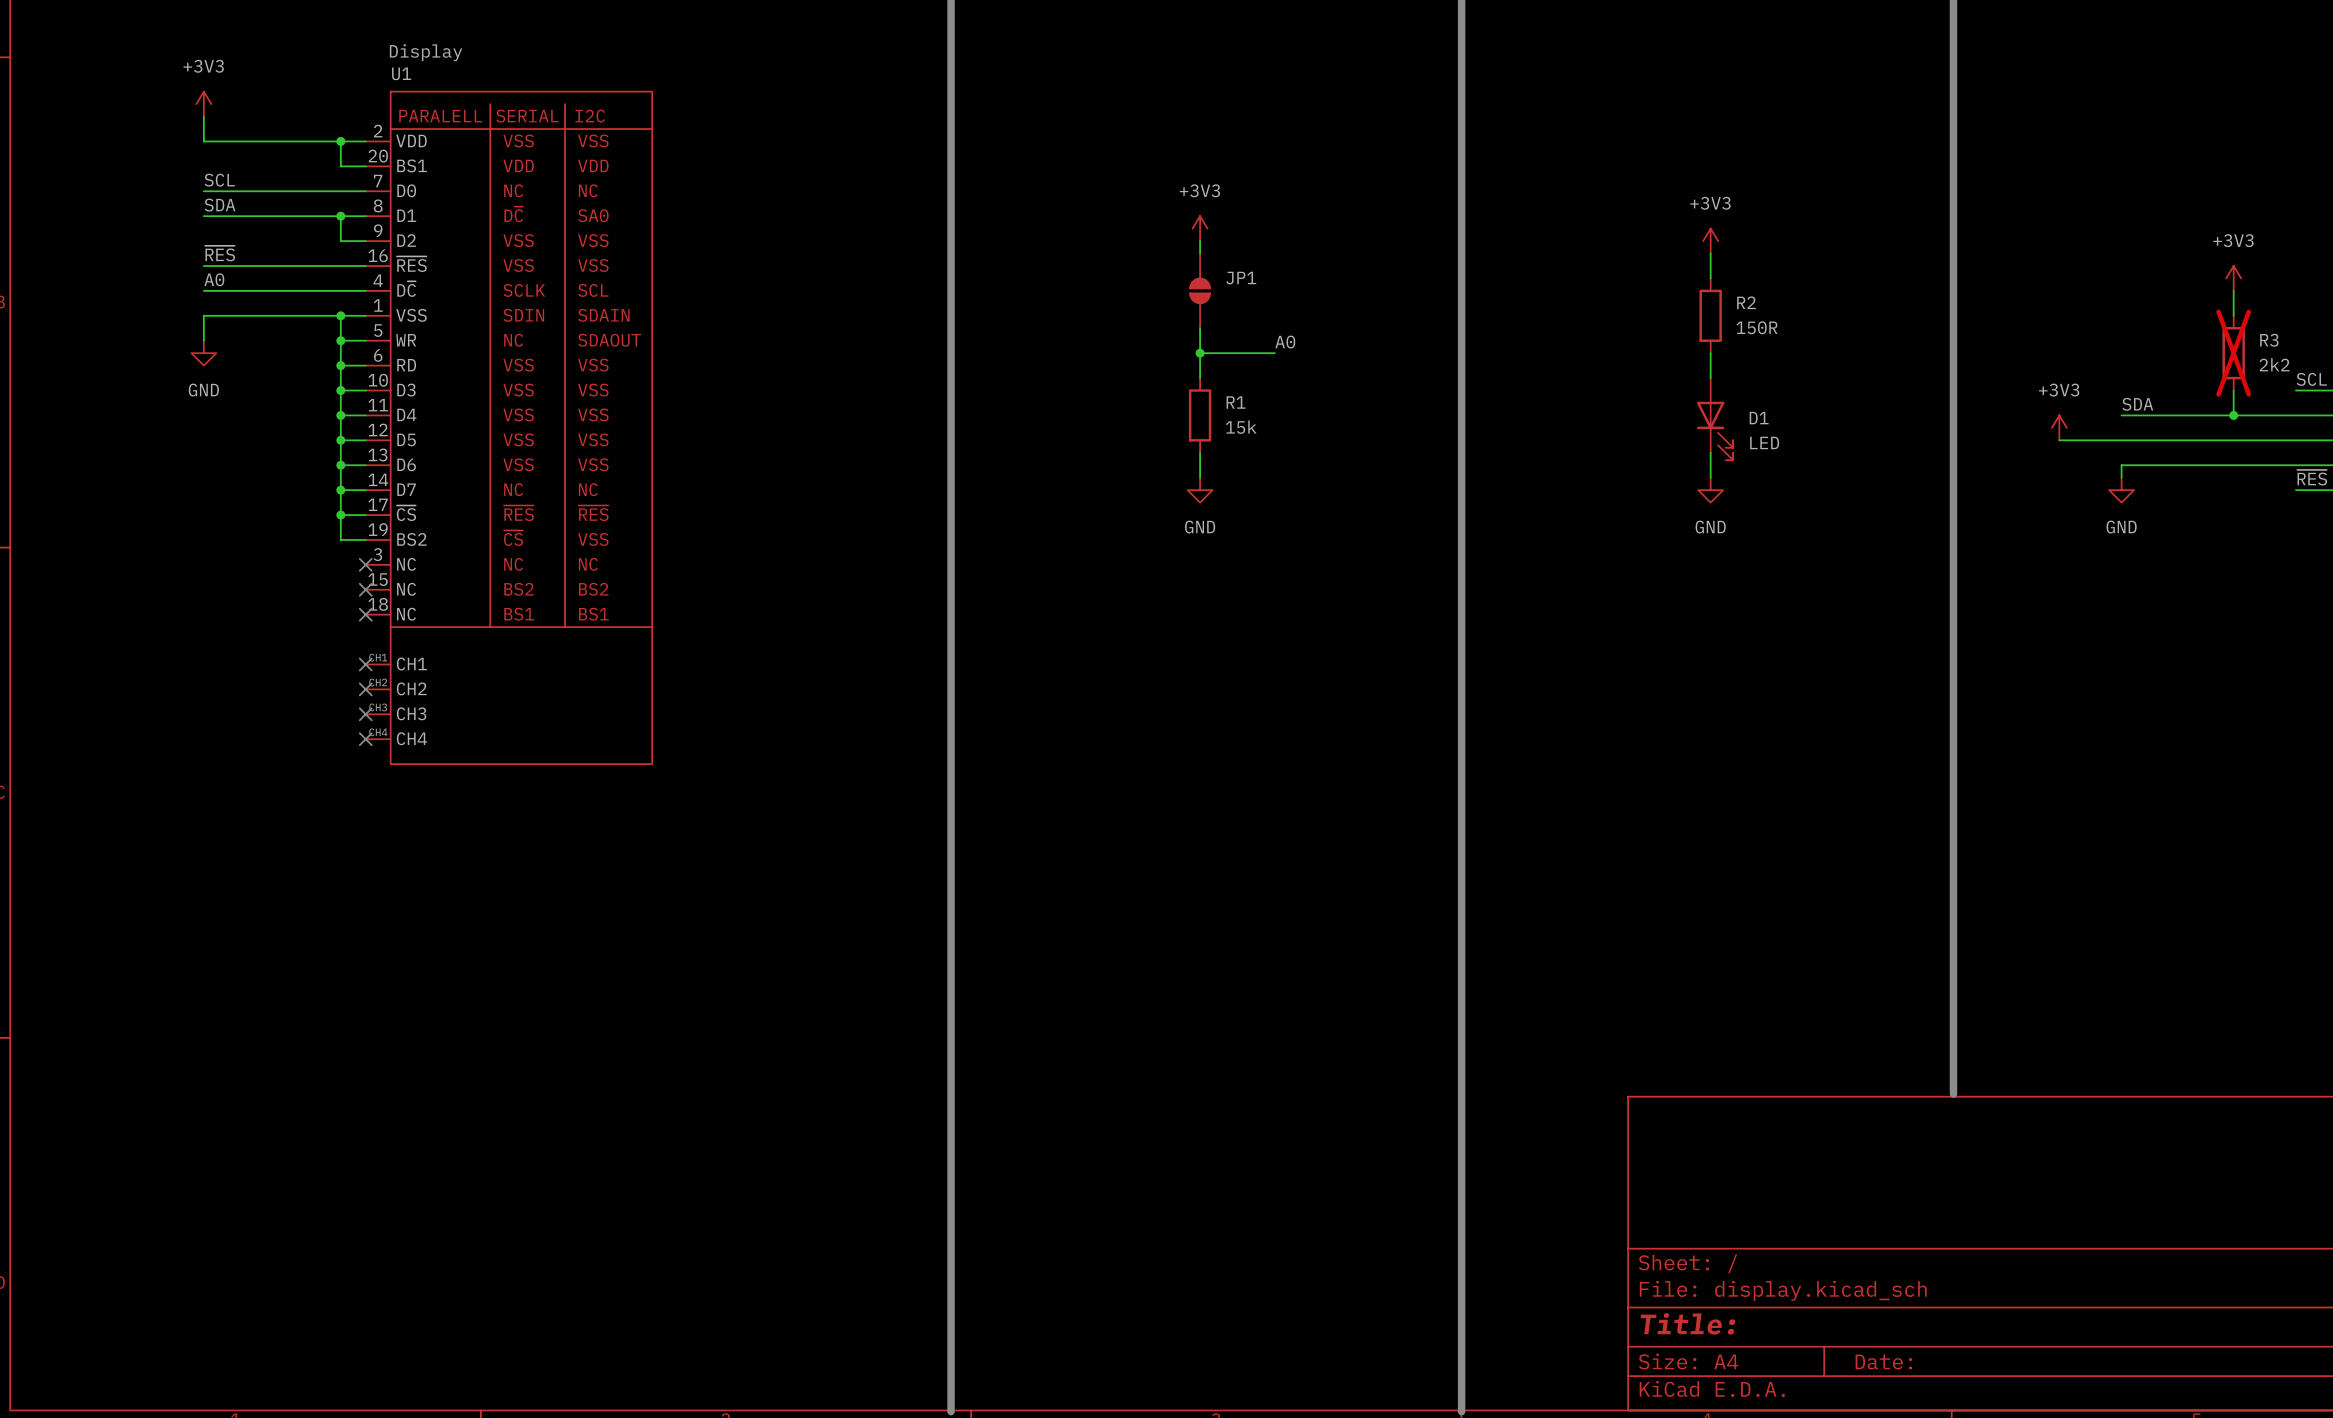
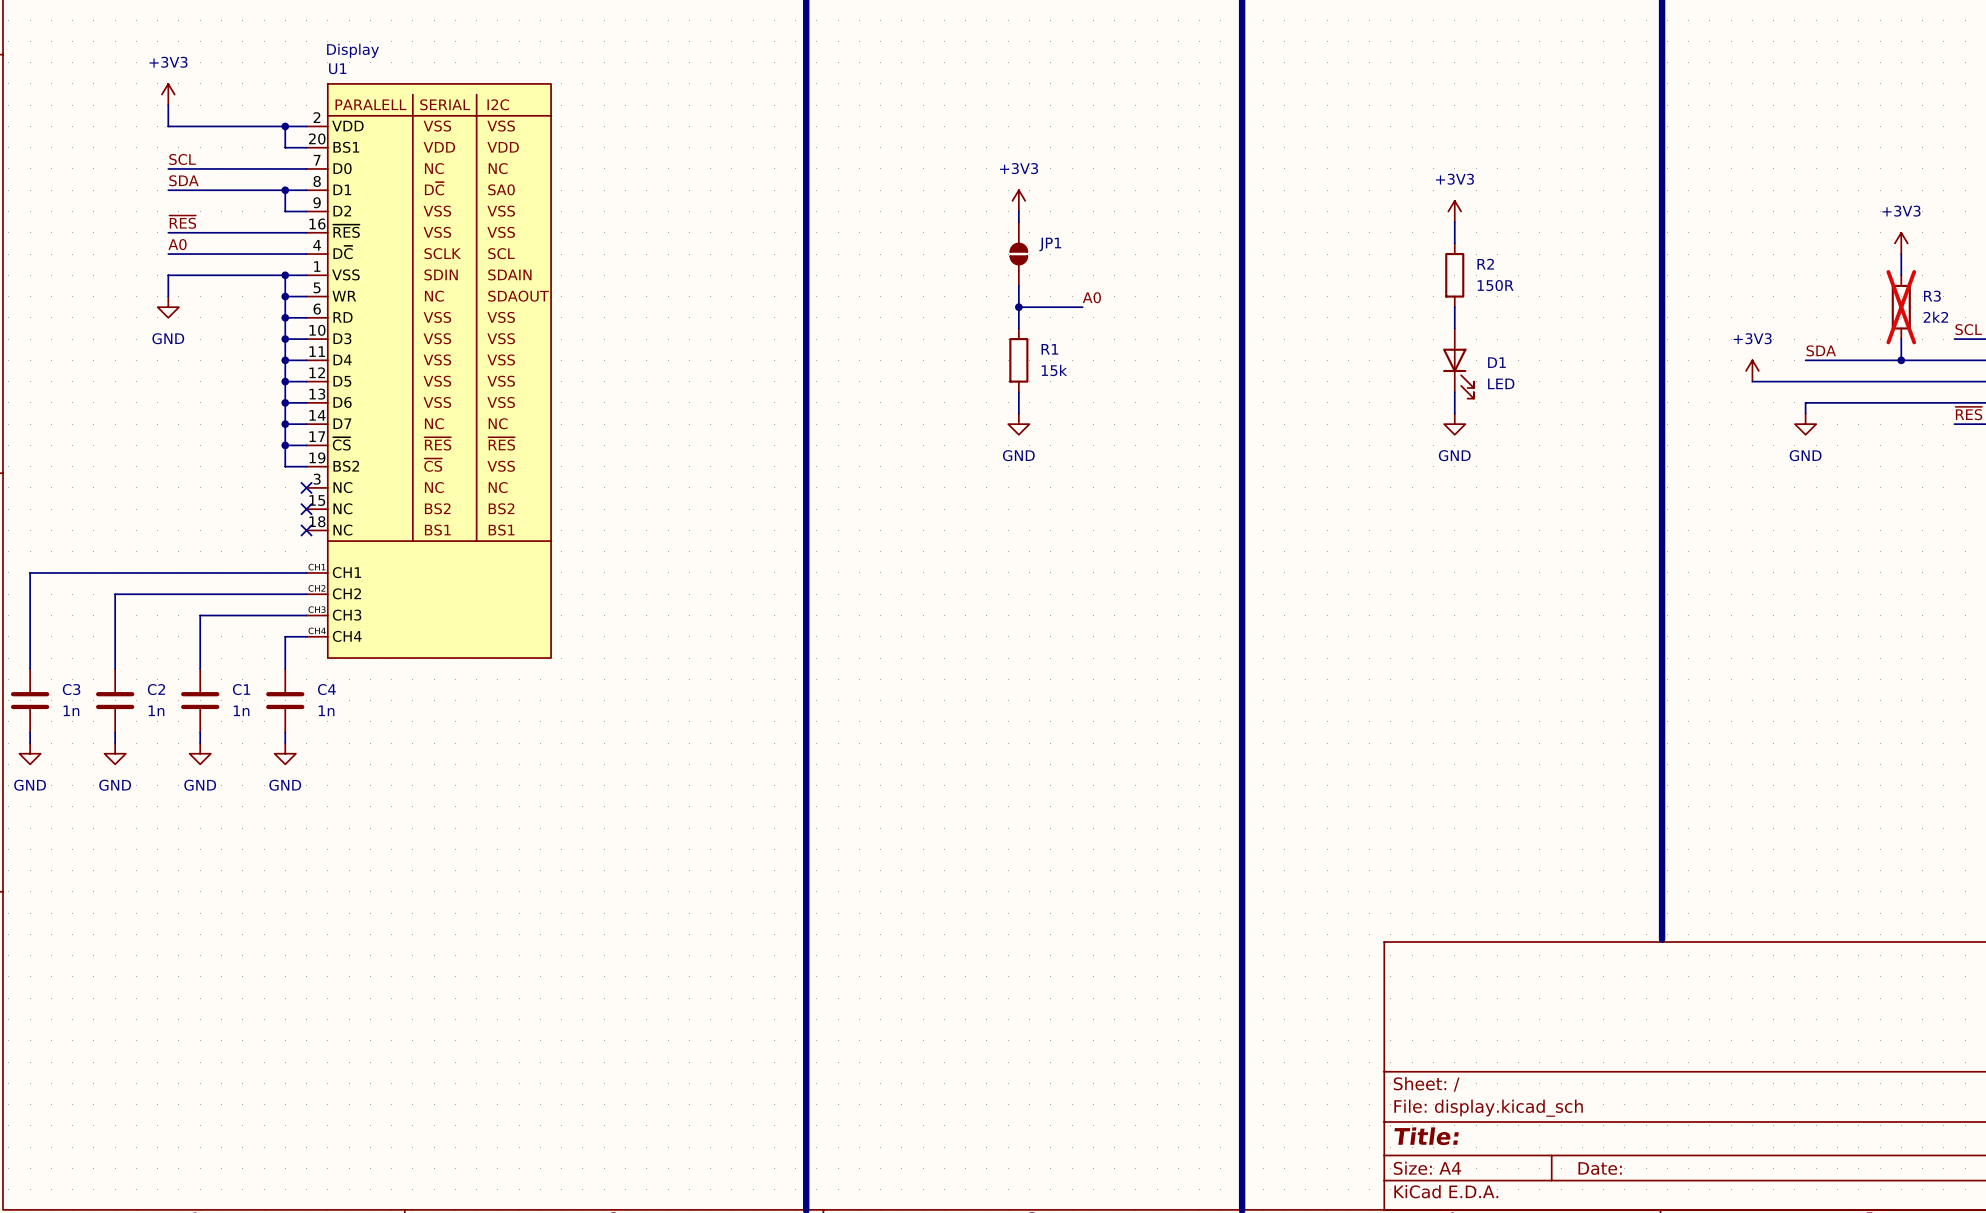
wire: none -> (306, 572) (30, 572) (30, 668)
no-connect mark: (365, 664) -> none
wire: none -> (306, 594) (115, 594) (115, 668)
no-connect mark: (365, 689) -> none
wire: none -> (306, 615) (200, 615) (200, 668)
no-connect mark: (365, 714) -> none
wire: none -> (306, 636) (285, 636) (285, 668)
no-connect mark: (365, 739) -> none
C3: none -> 1n (30, 700)
C2: none -> 1n (115, 700)
C1: none -> 1n (200, 700)
C4: none -> 1n (285, 700)
wire: none -> (30, 732) (30, 743)
wire: none -> (115, 732) (115, 743)
wire: none -> (200, 732) (200, 743)
wire: none -> (285, 732) (285, 743)
power symbol: none -> GND (30, 753)
power symbol: none -> GND (115, 753)
power symbol: none -> GND (200, 753)
power symbol: none -> GND (285, 753)

